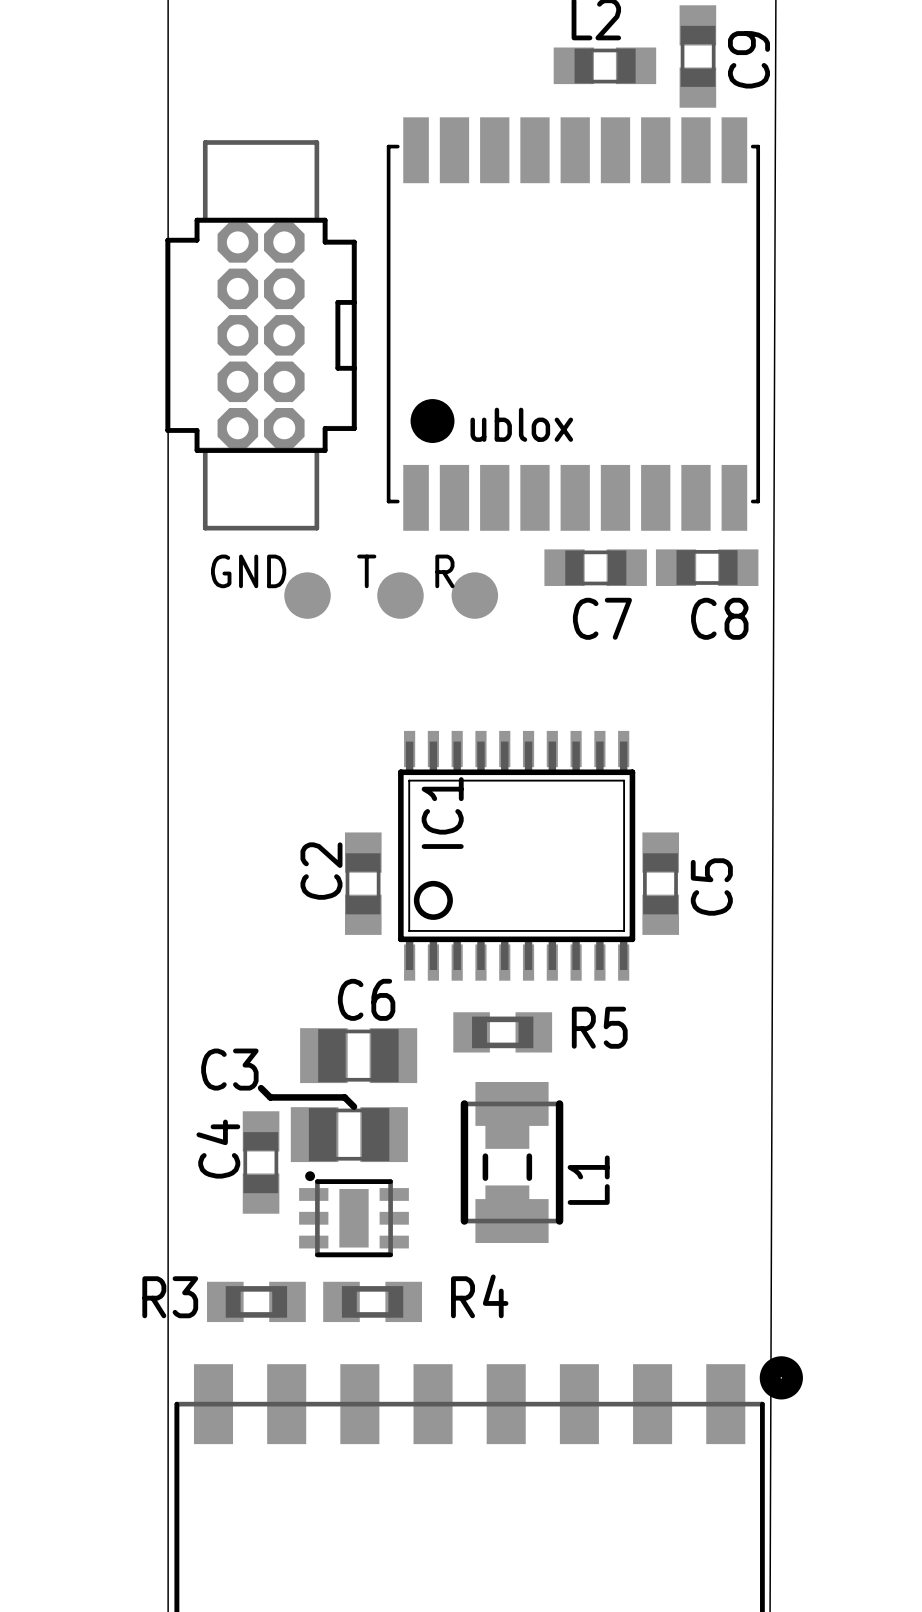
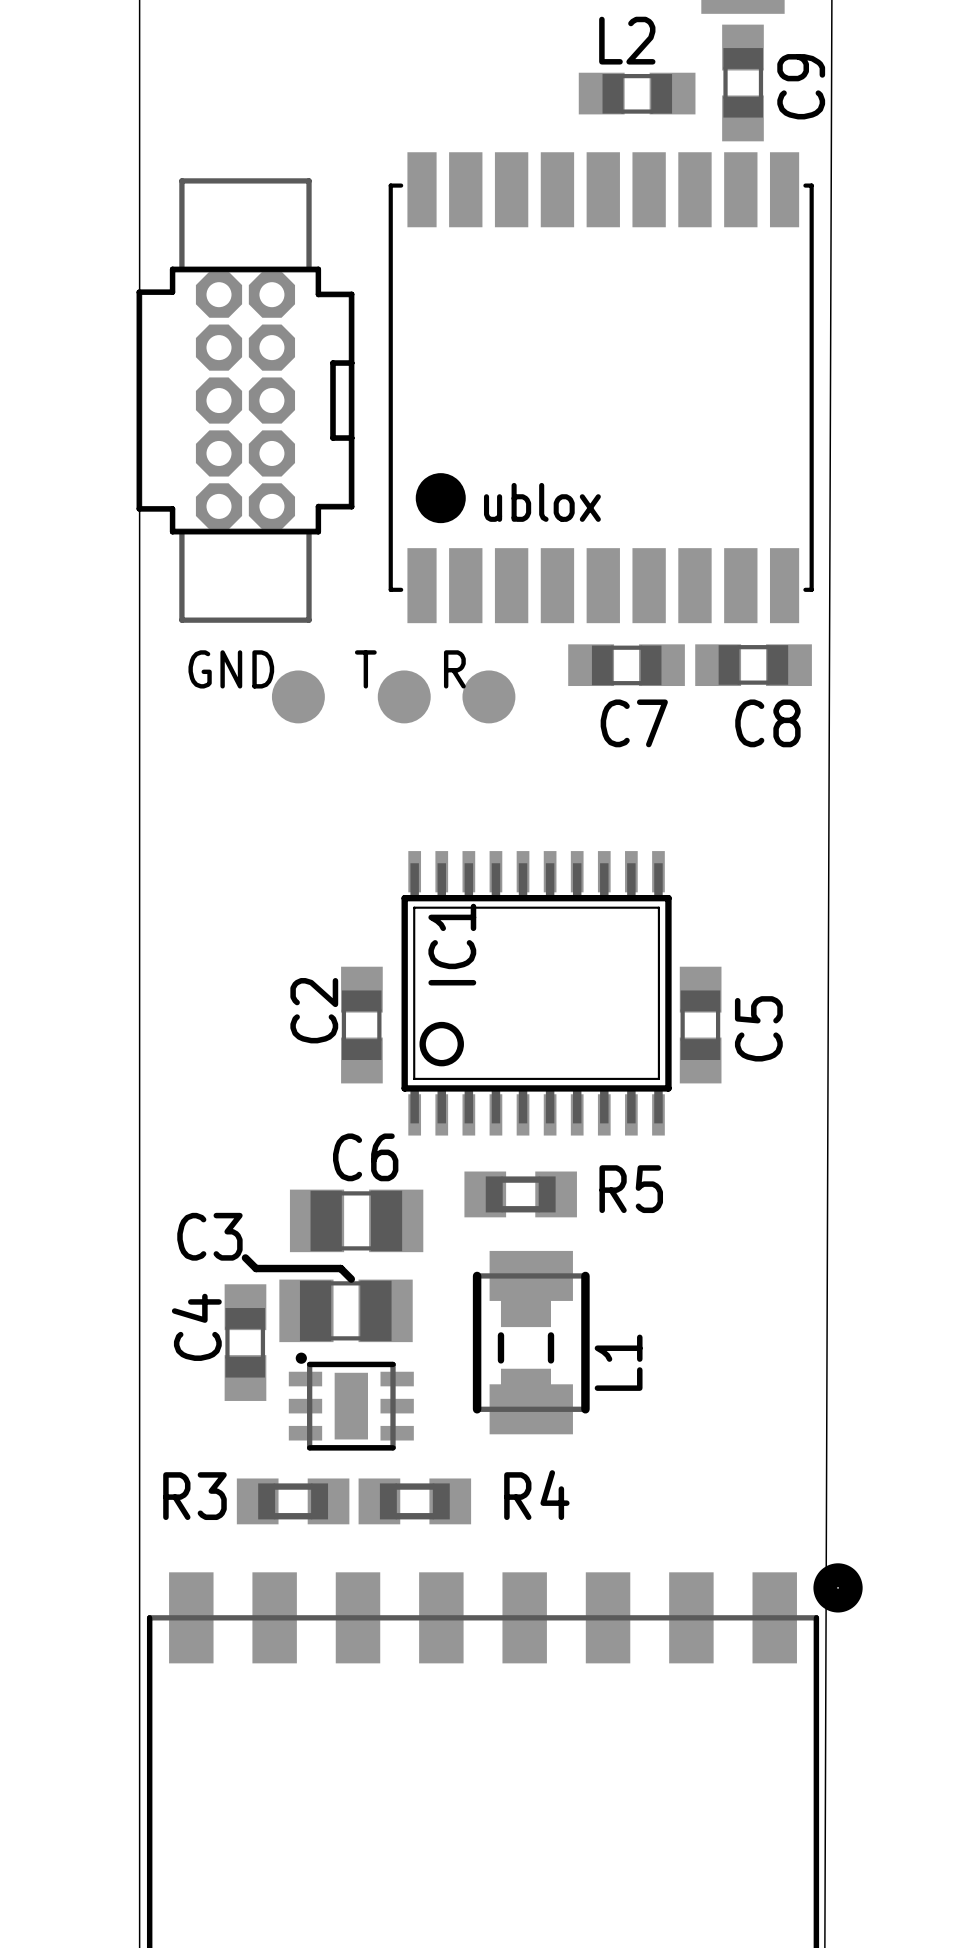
R3 position: (256, 1301) -> (293, 1501)
R4 position: (372, 1301) -> (414, 1501)

